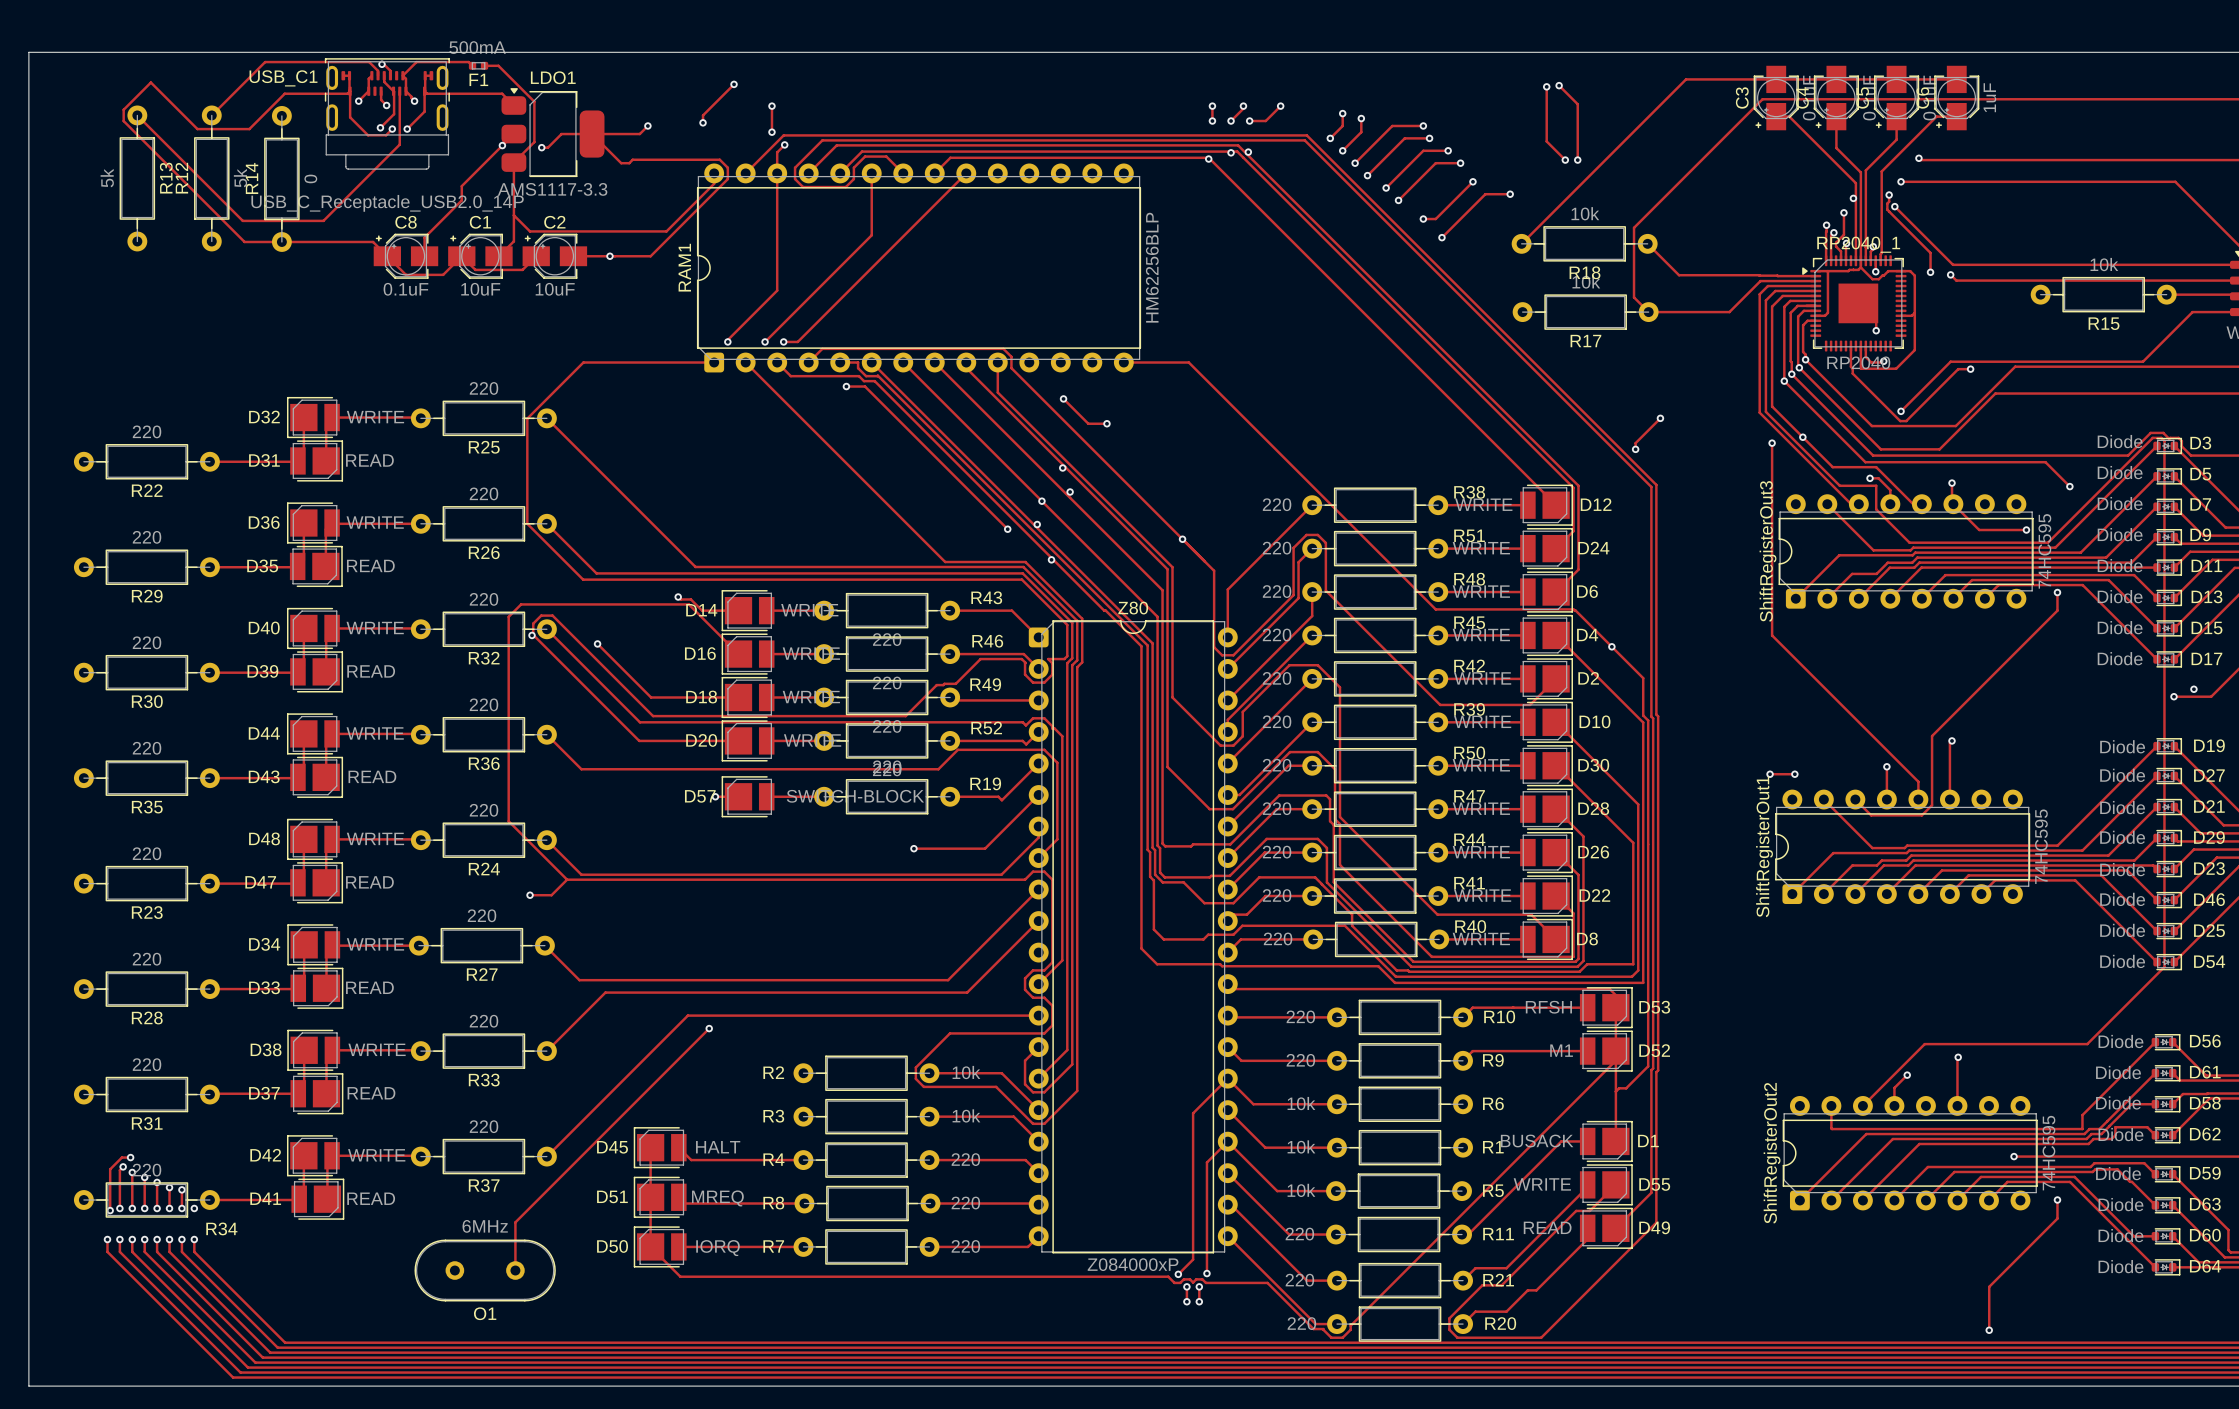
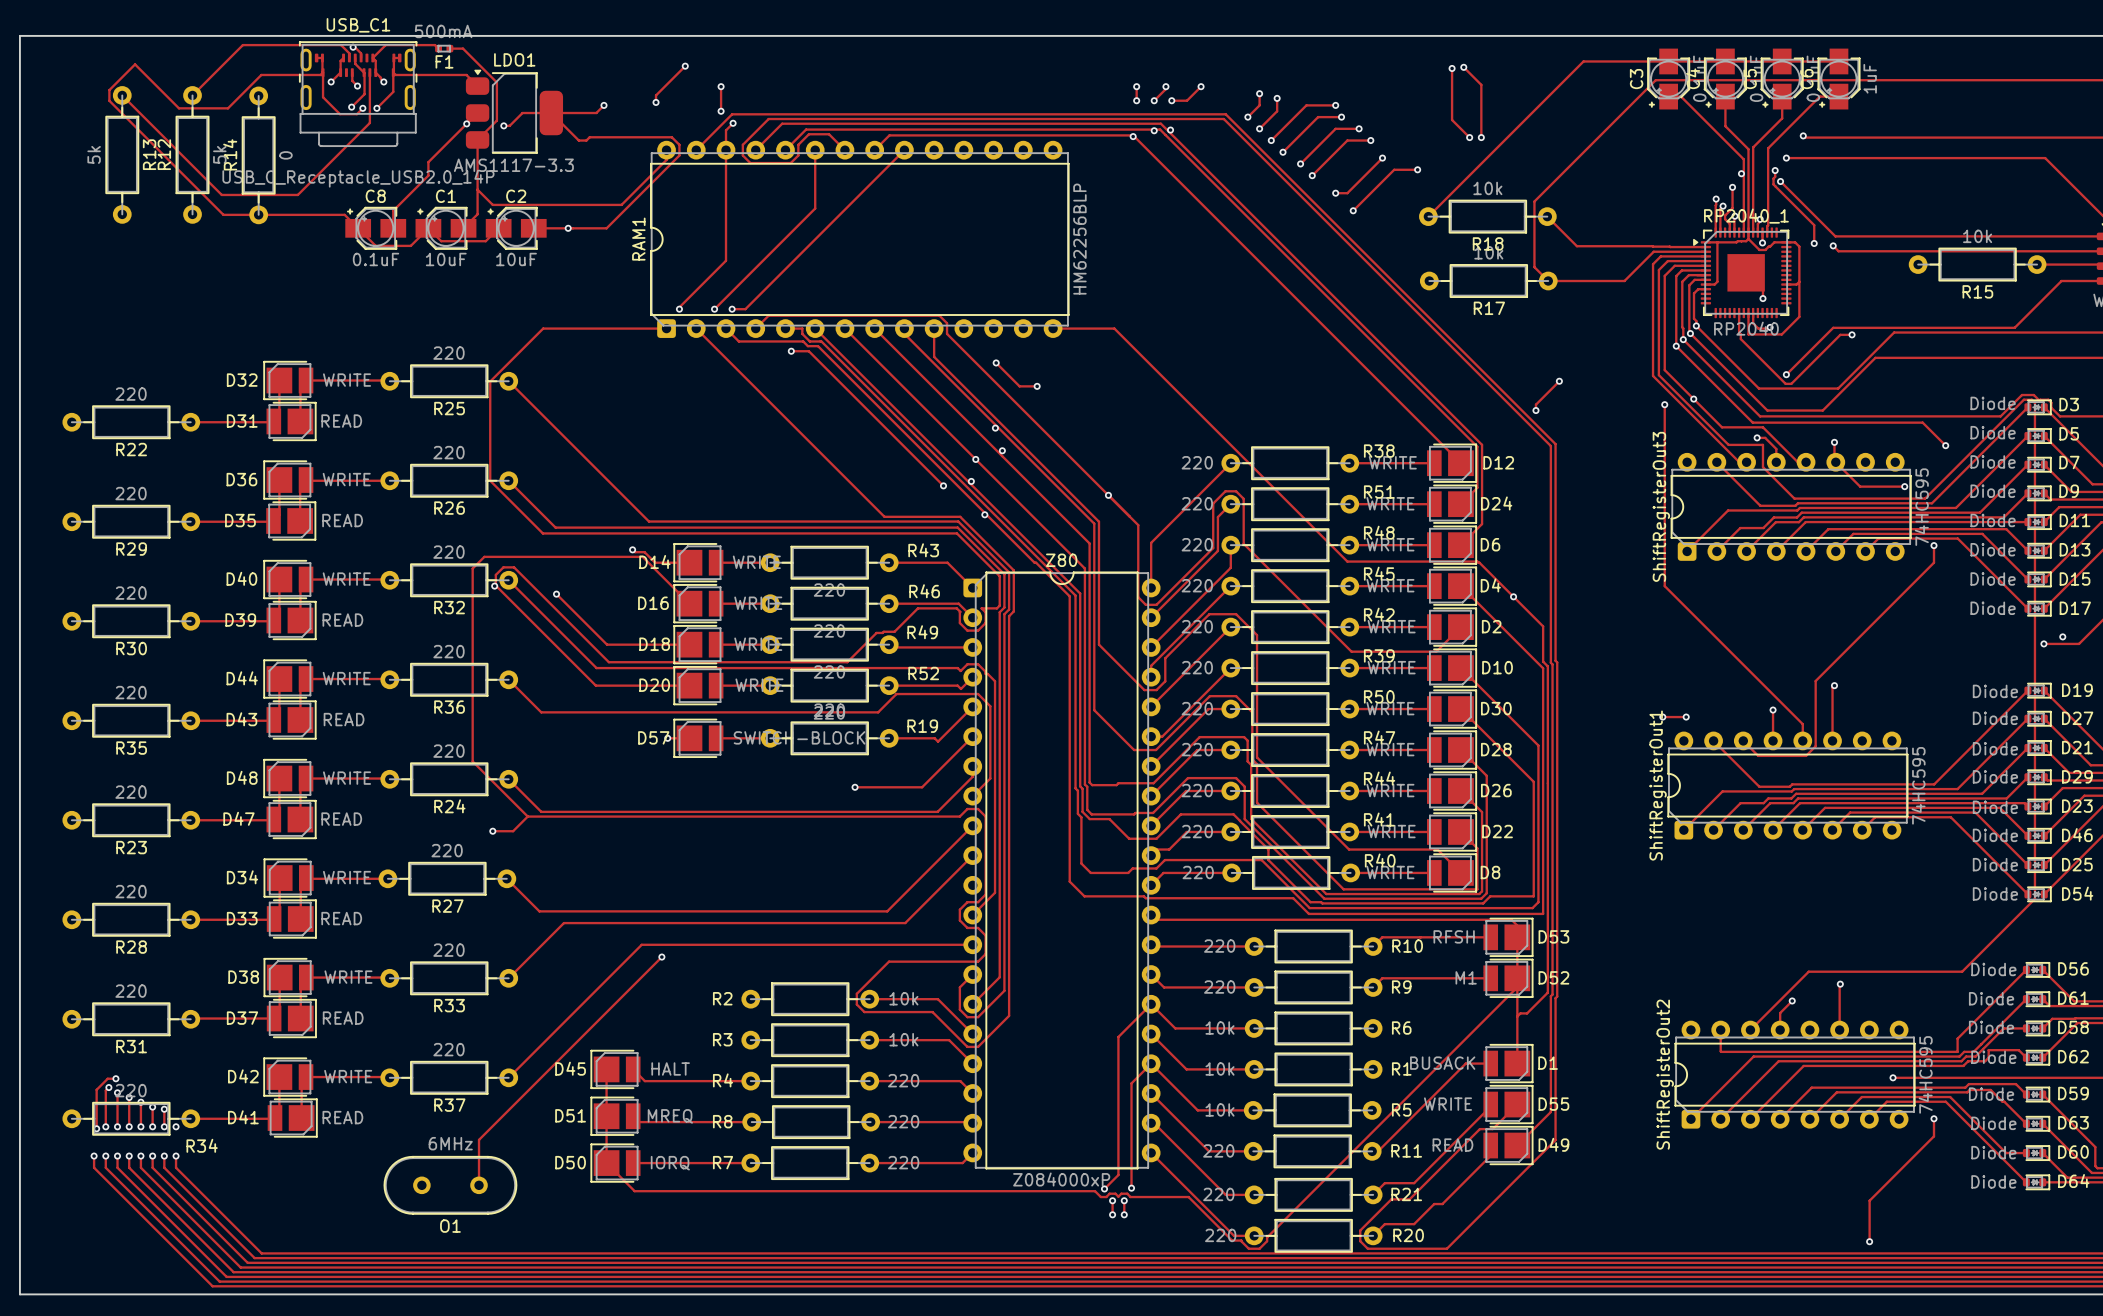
USB_C1 name position: USB_C1 (283, 78) -> USB_C1 (358, 25)

